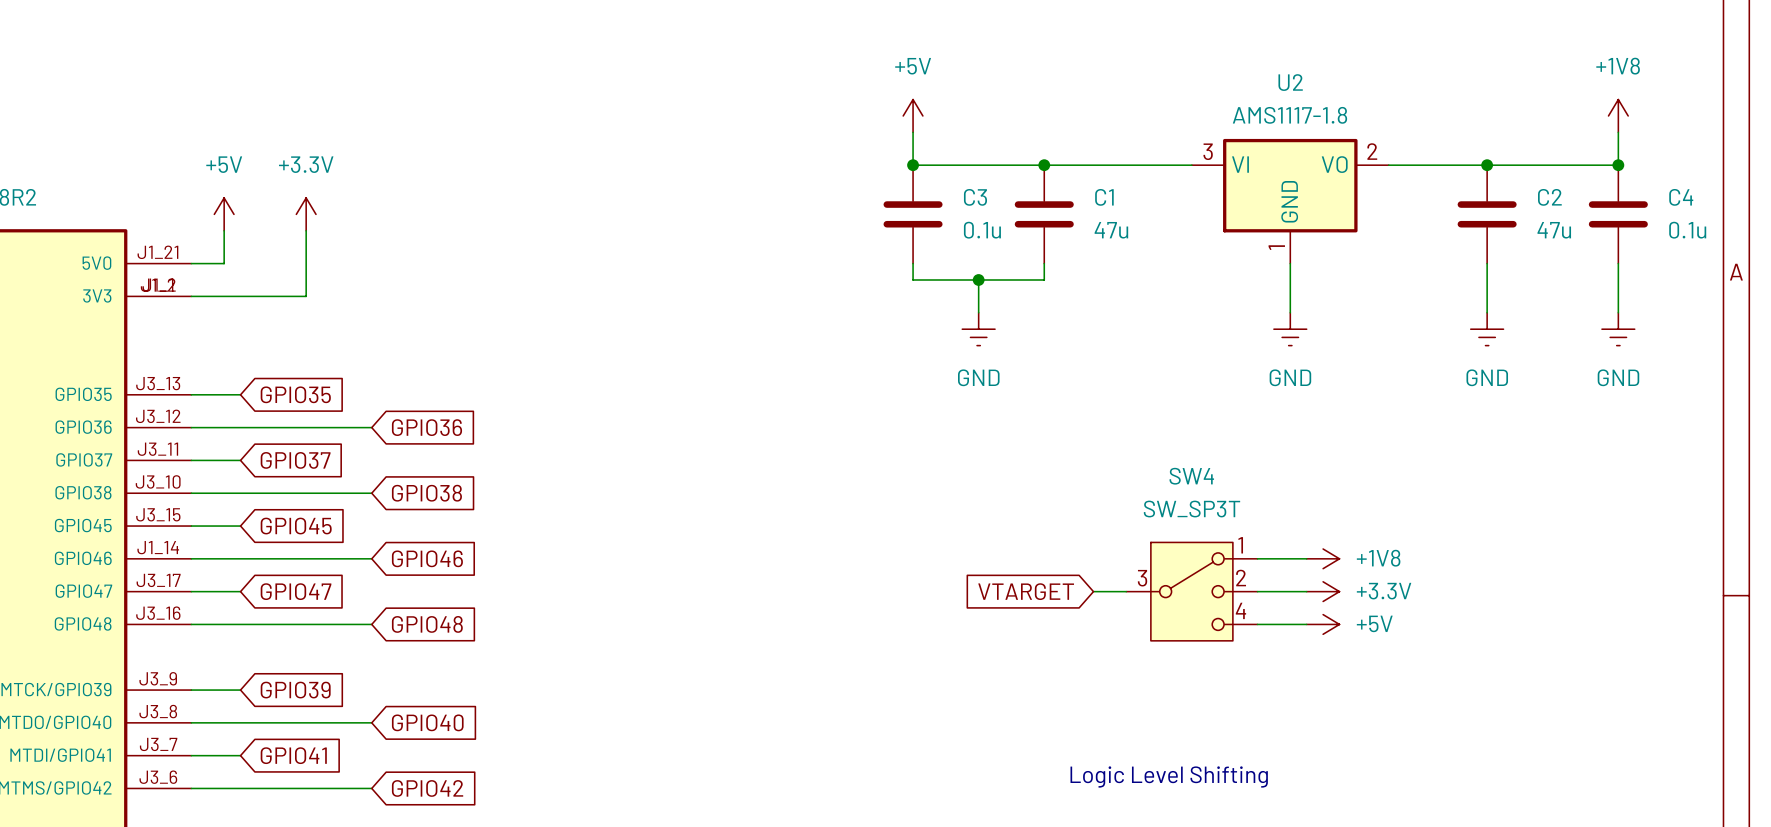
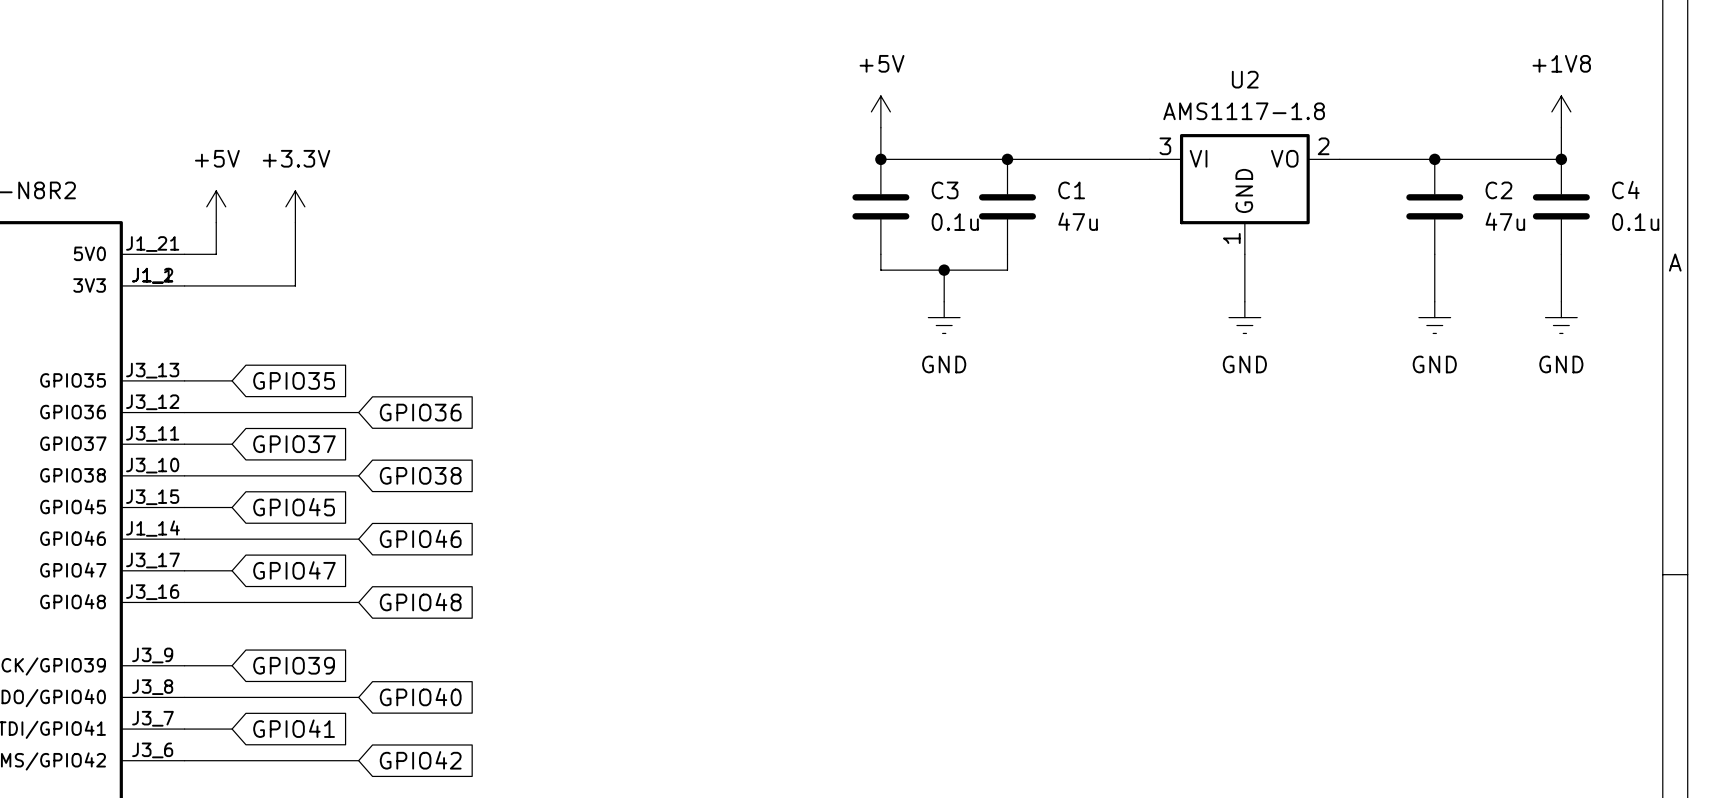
wire: (1257, 558) (1306, 558) -> none
power symbol: +1V8 (1323, 558) -> none
global label: VTARGET (1026, 591) -> none
wire: (1093, 591) (1126, 591) -> none
SW4: SW_SP3T (1191, 591) -> none
wire: (1257, 591) (1306, 591) -> none
power symbol: +3.3V (1323, 591) -> none
wire: (1257, 624) (1306, 624) -> none
power symbol: +5V (1323, 624) -> none
text: Logic Level Shifting (1169, 777) -> none

